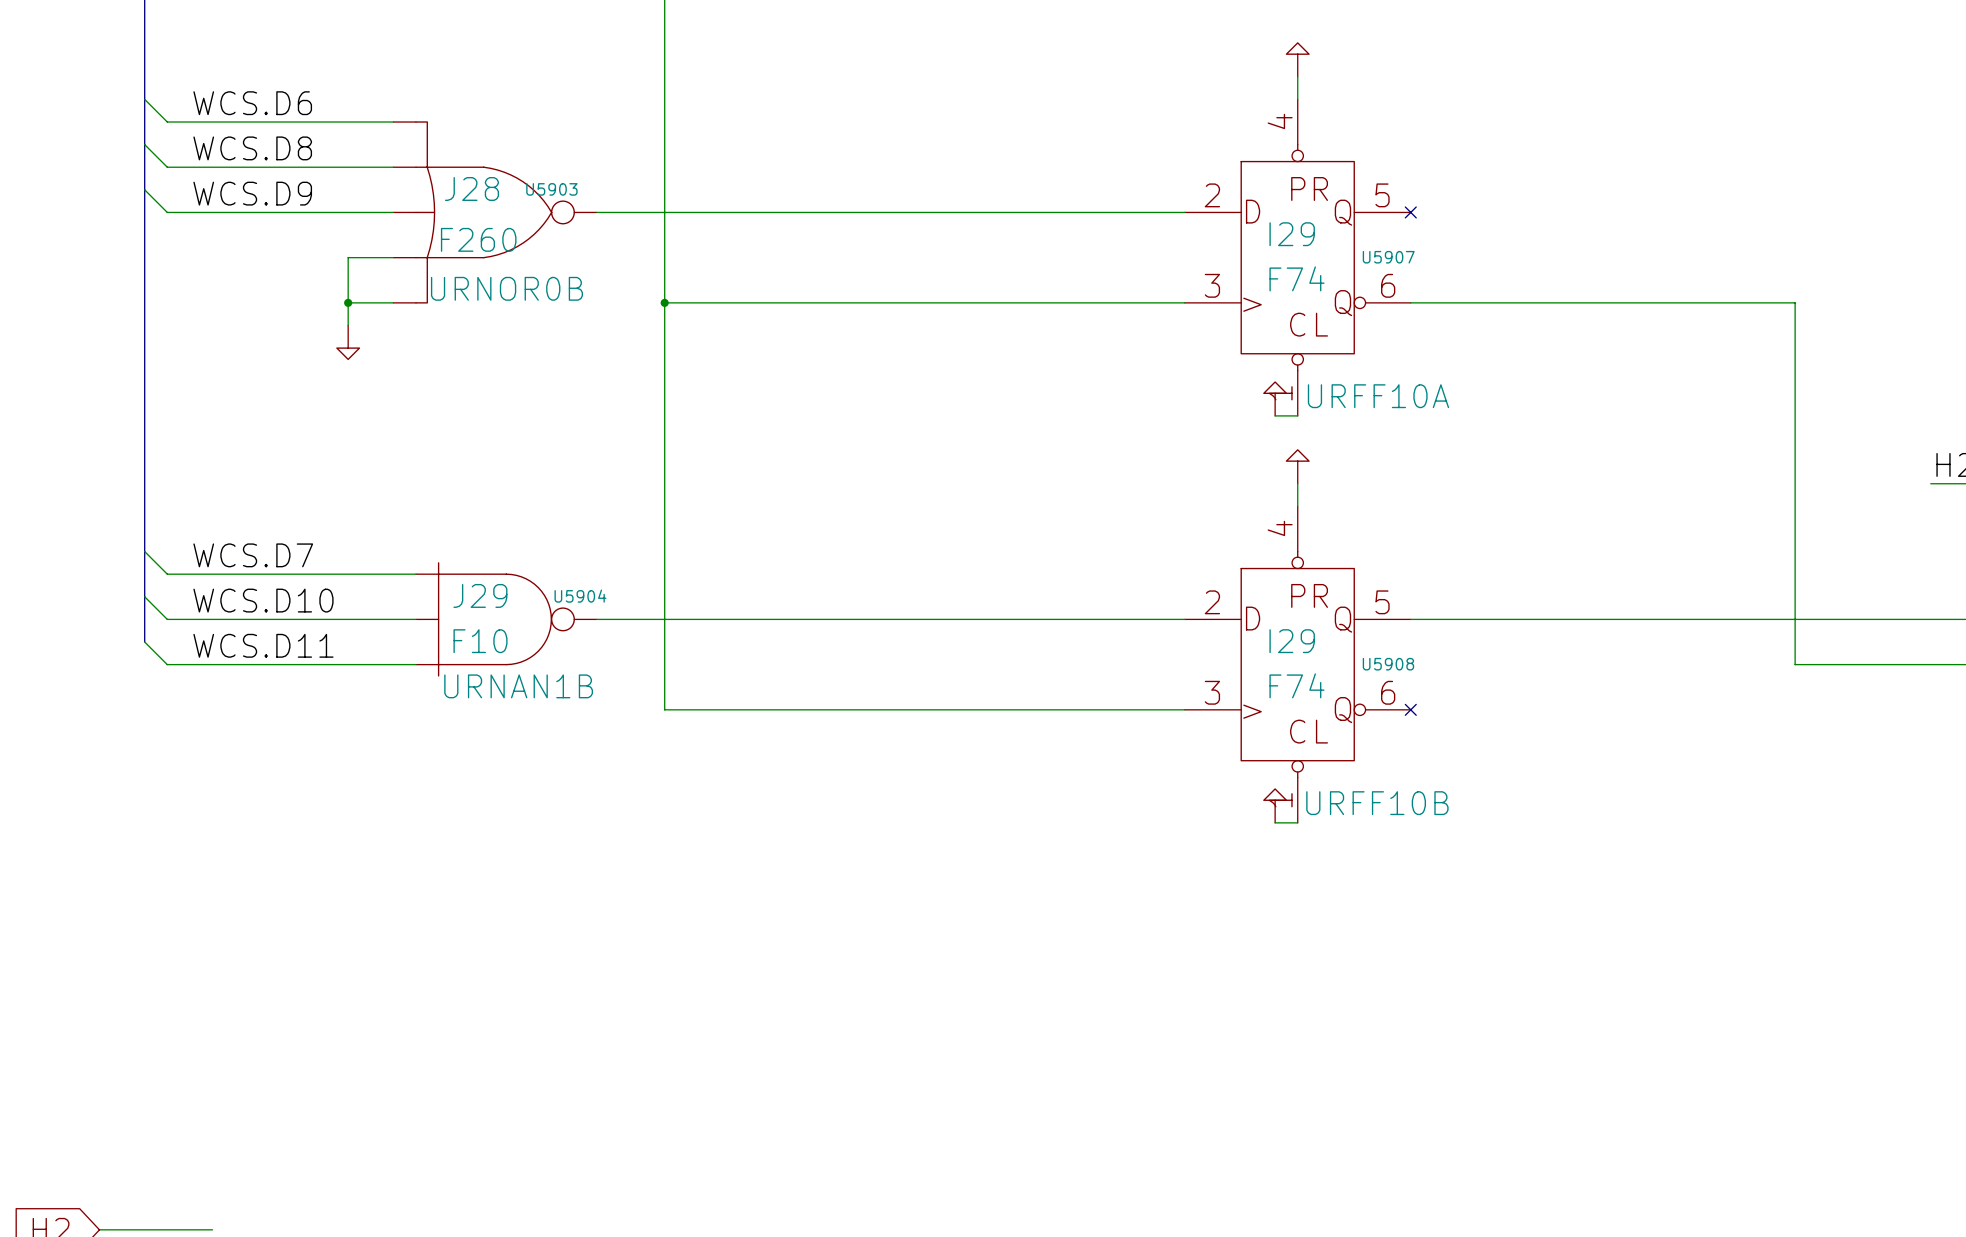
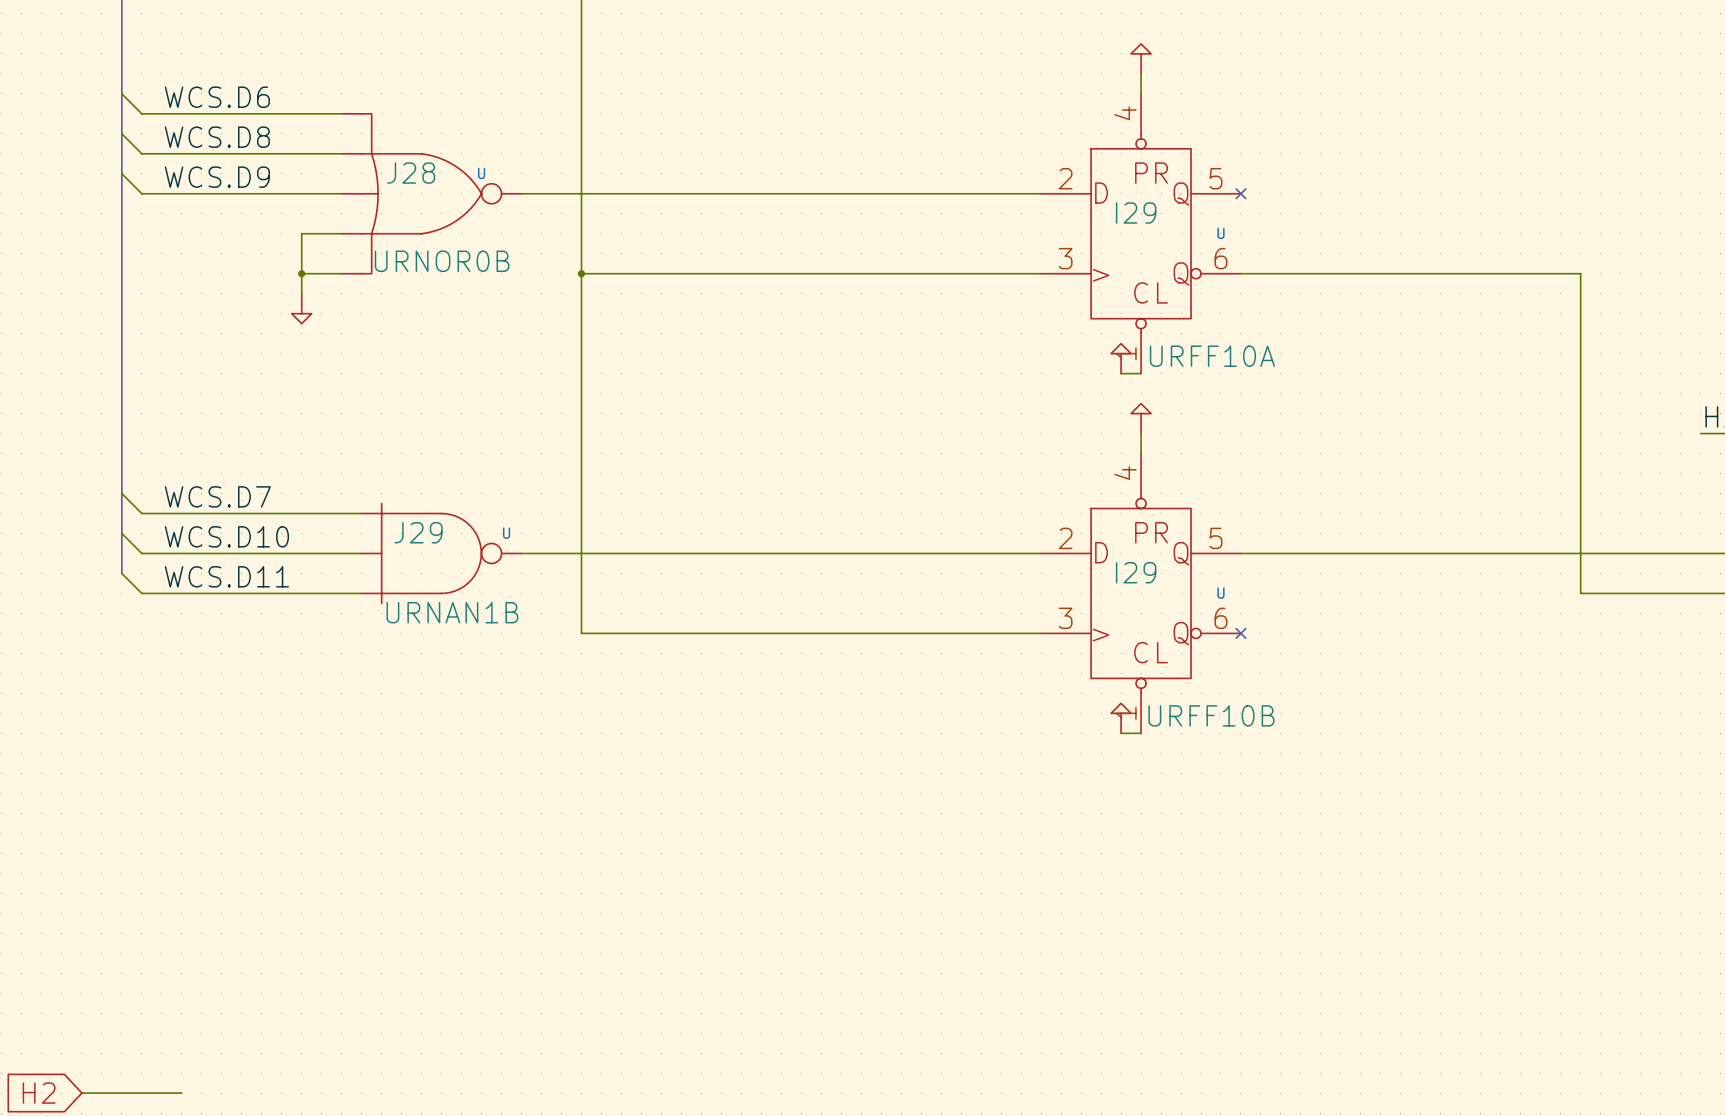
U5903 name: U5903 (551, 189) -> U (481, 173)
U5903 value: F260 (478, 239) -> none
U5907 name: U5907 (1388, 257) -> U (1220, 233)
U5907 value: F74 (1297, 278) -> none
U5904 name: U5904 (580, 596) -> U (506, 533)
U5904 value: F10 (480, 641) -> none
U5908 name: U5908 (1388, 664) -> U (1220, 593)
U5908 value: F74 (1297, 685) -> none

